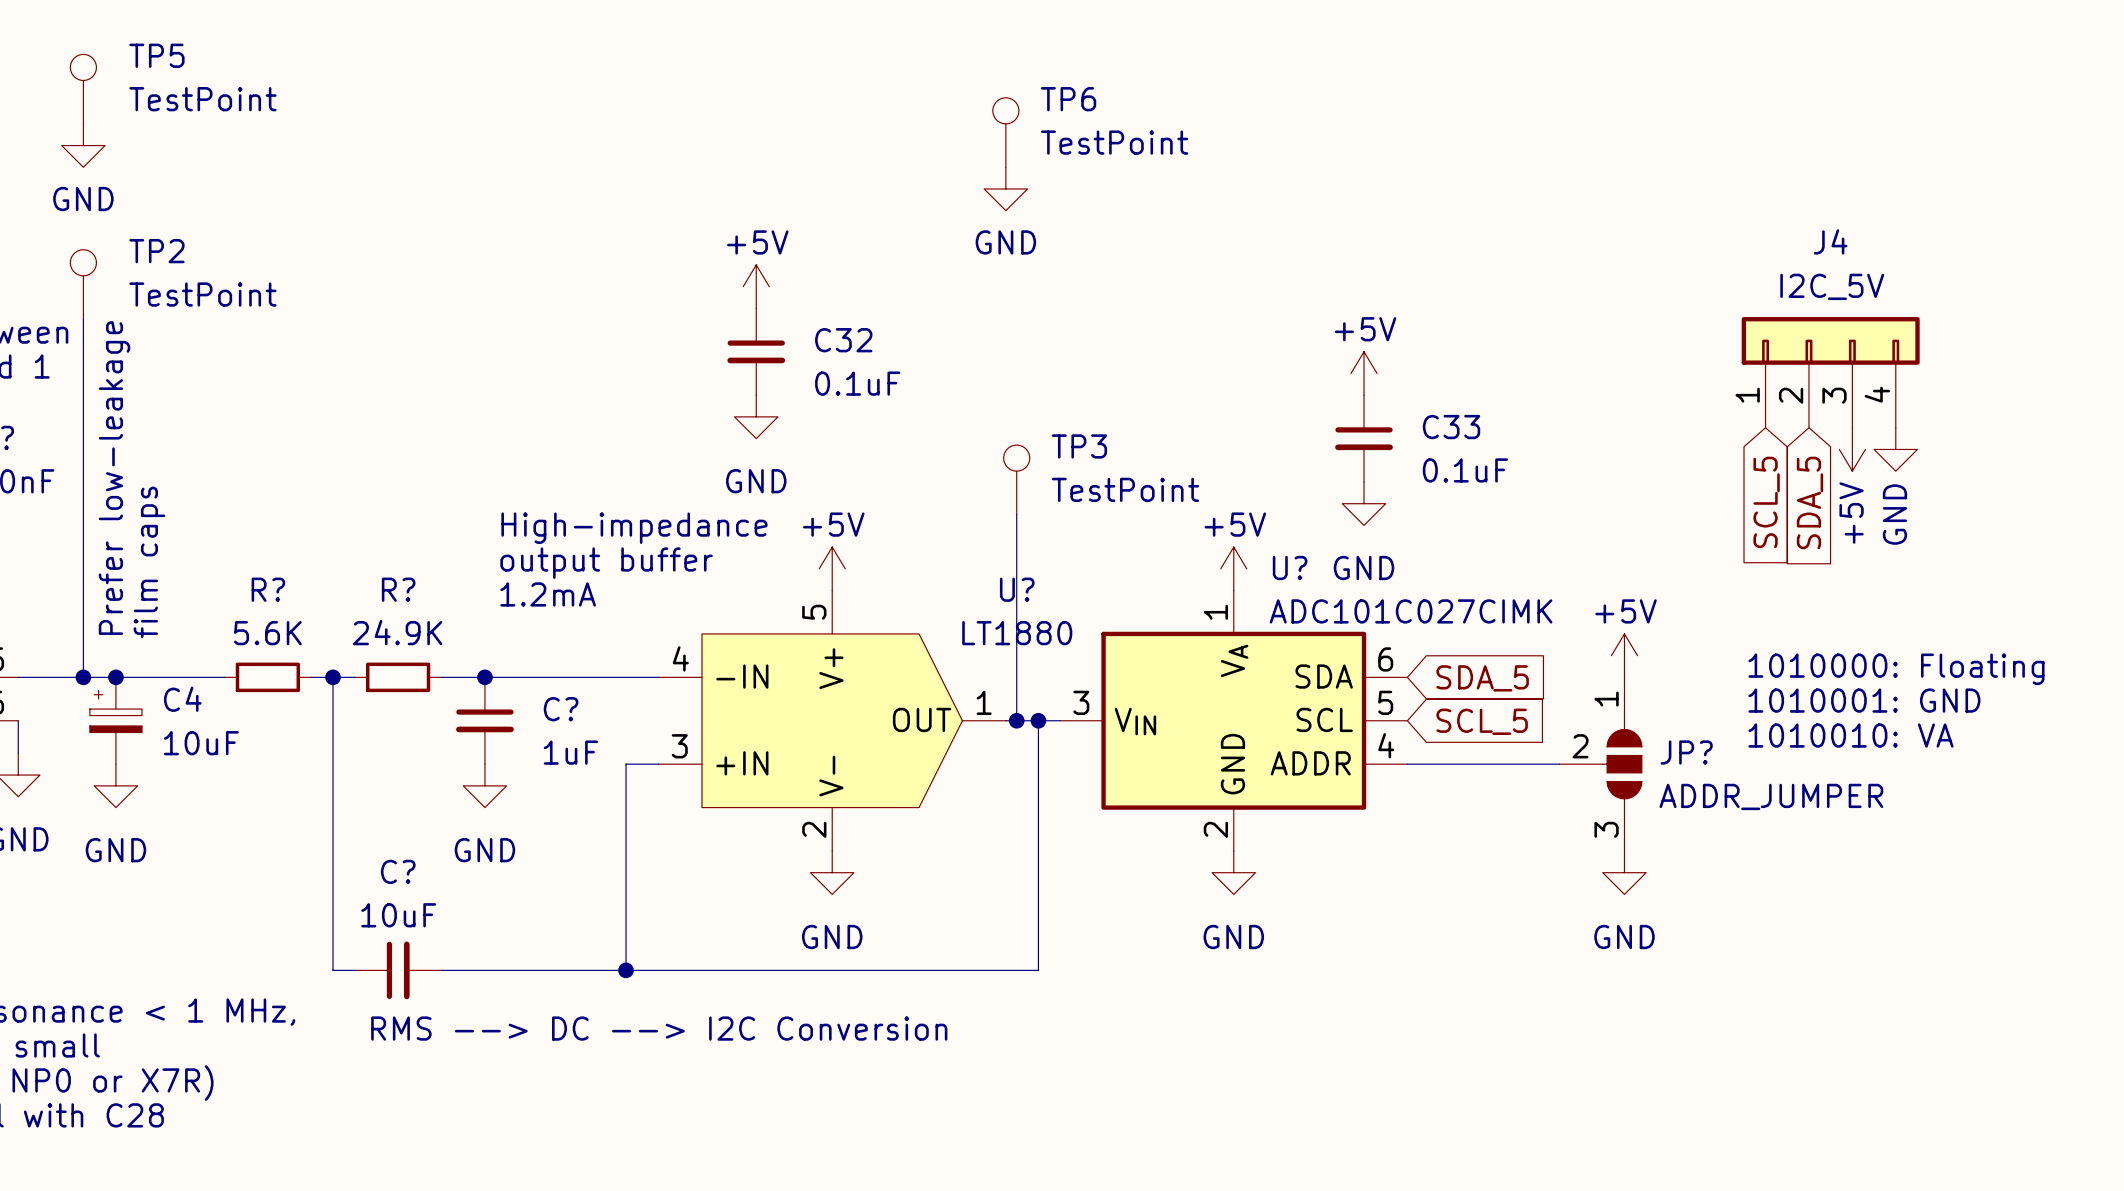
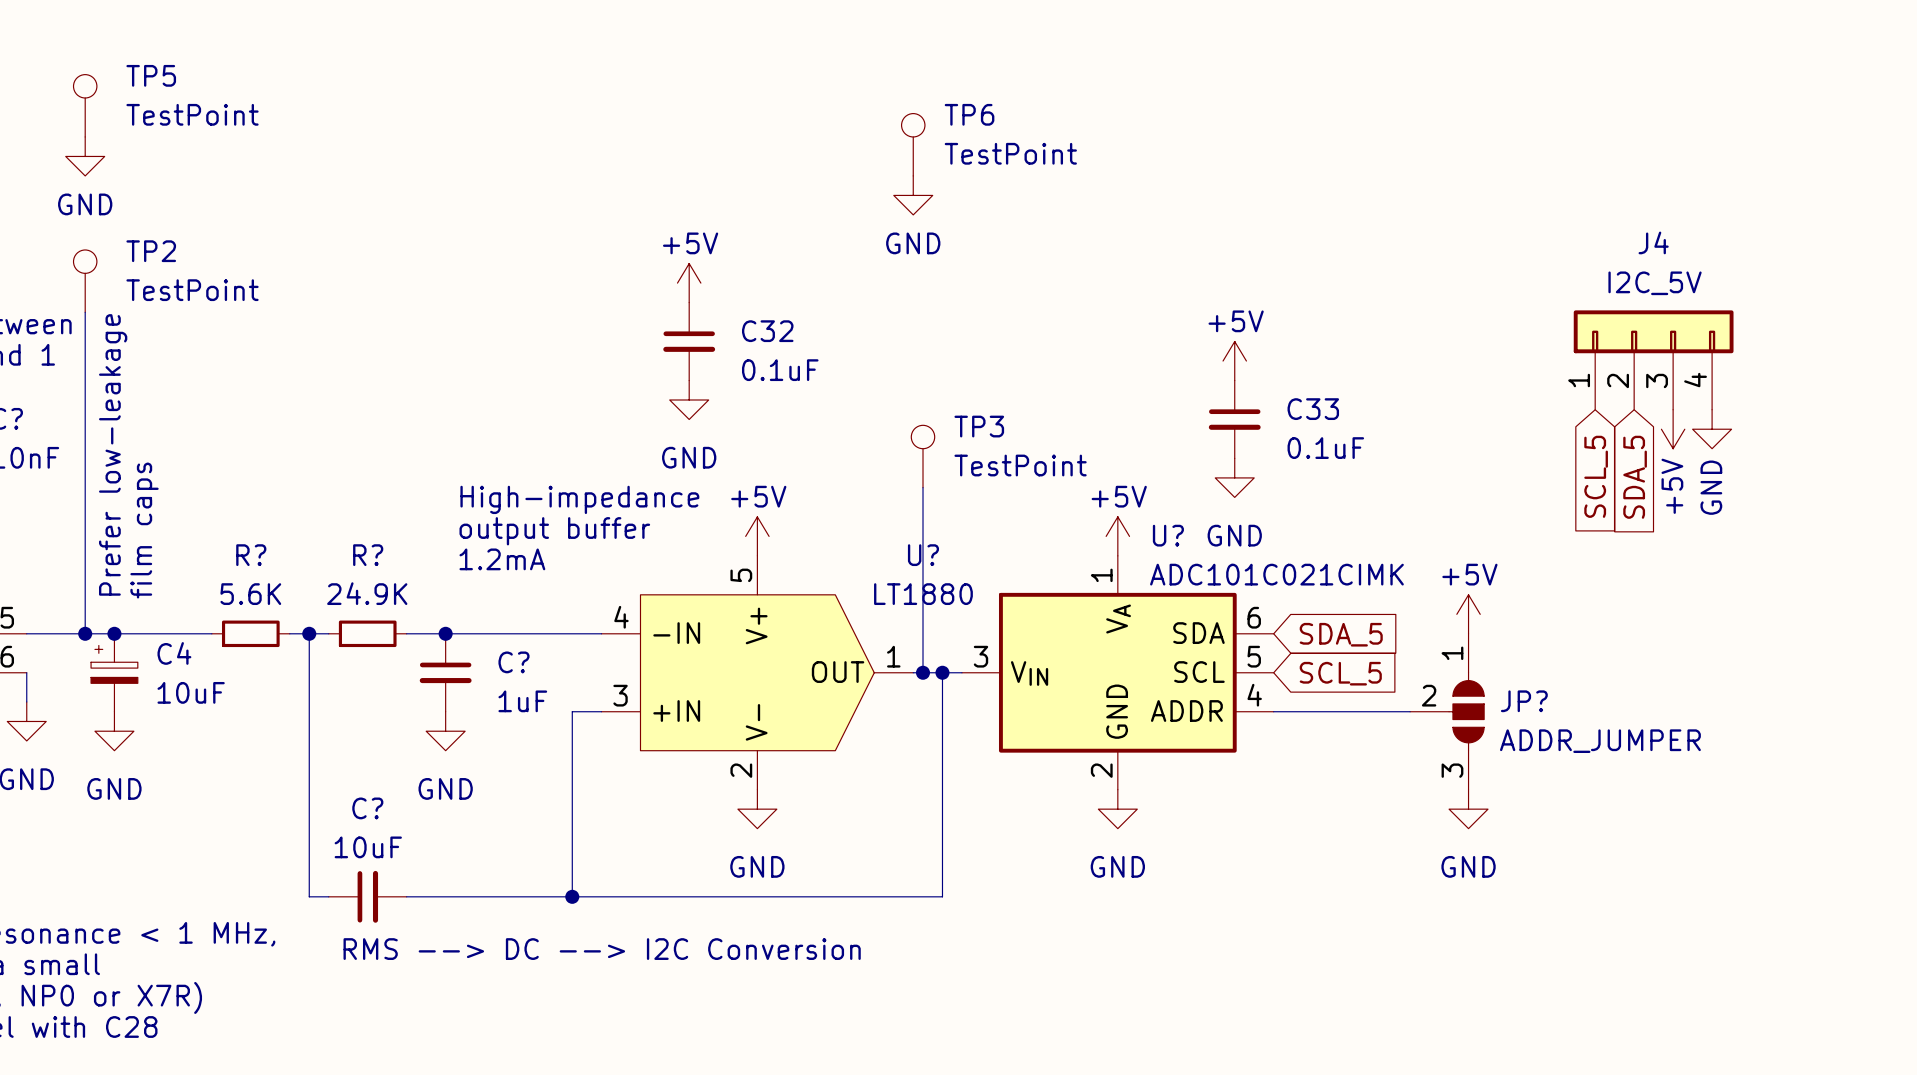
U? value: ADC101C027CIMK (1411, 611) -> ADC101C021CIMK (1276, 574)
text: 1010000: Floating (1896, 669) -> none
text: 1010001: GND (1864, 700) -> none
text: 1010010: VA (1850, 735) -> none

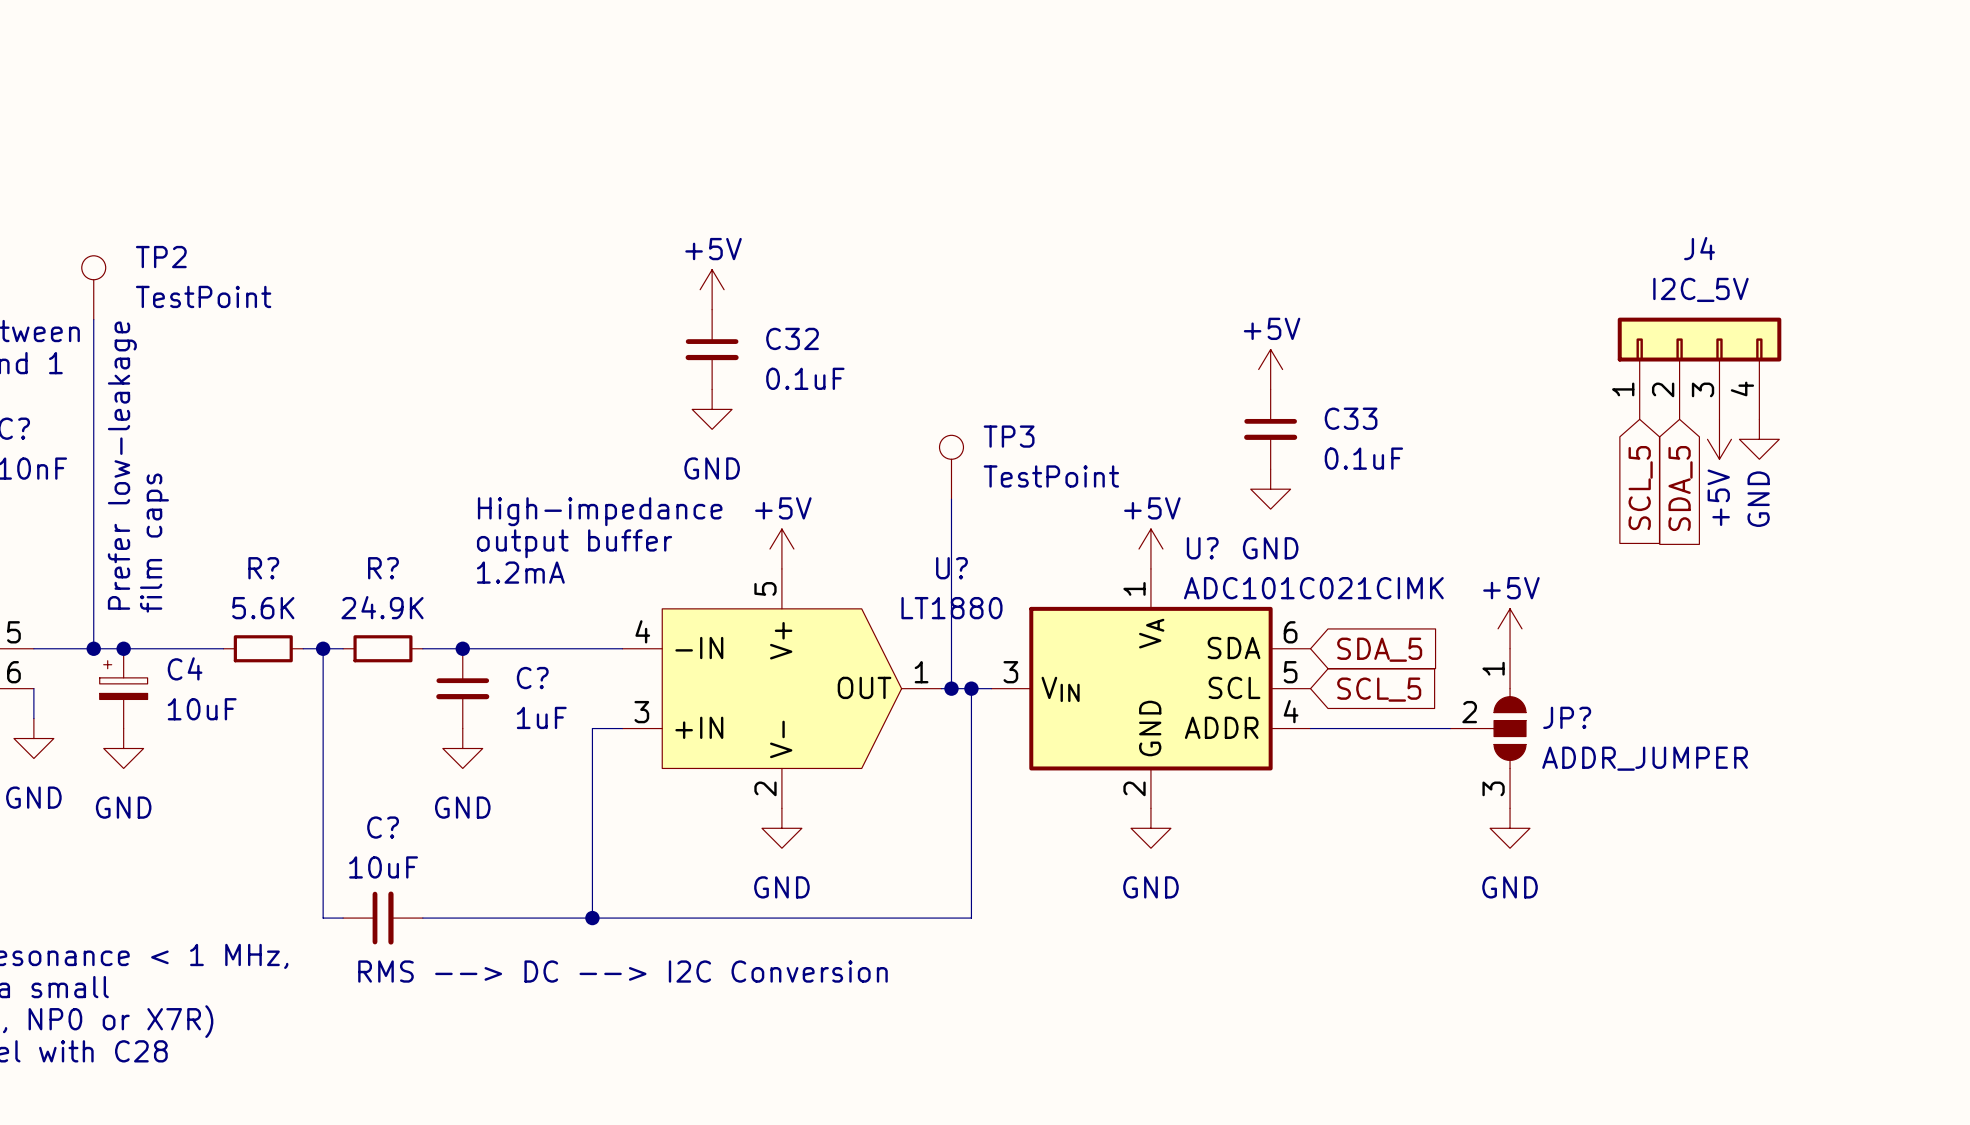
TP5: TestPoint (85, 105) -> none
TP6: TestPoint (913, 144) -> none
power symbol: GND (85, 156) -> none
power symbol: GND (913, 195) -> none

